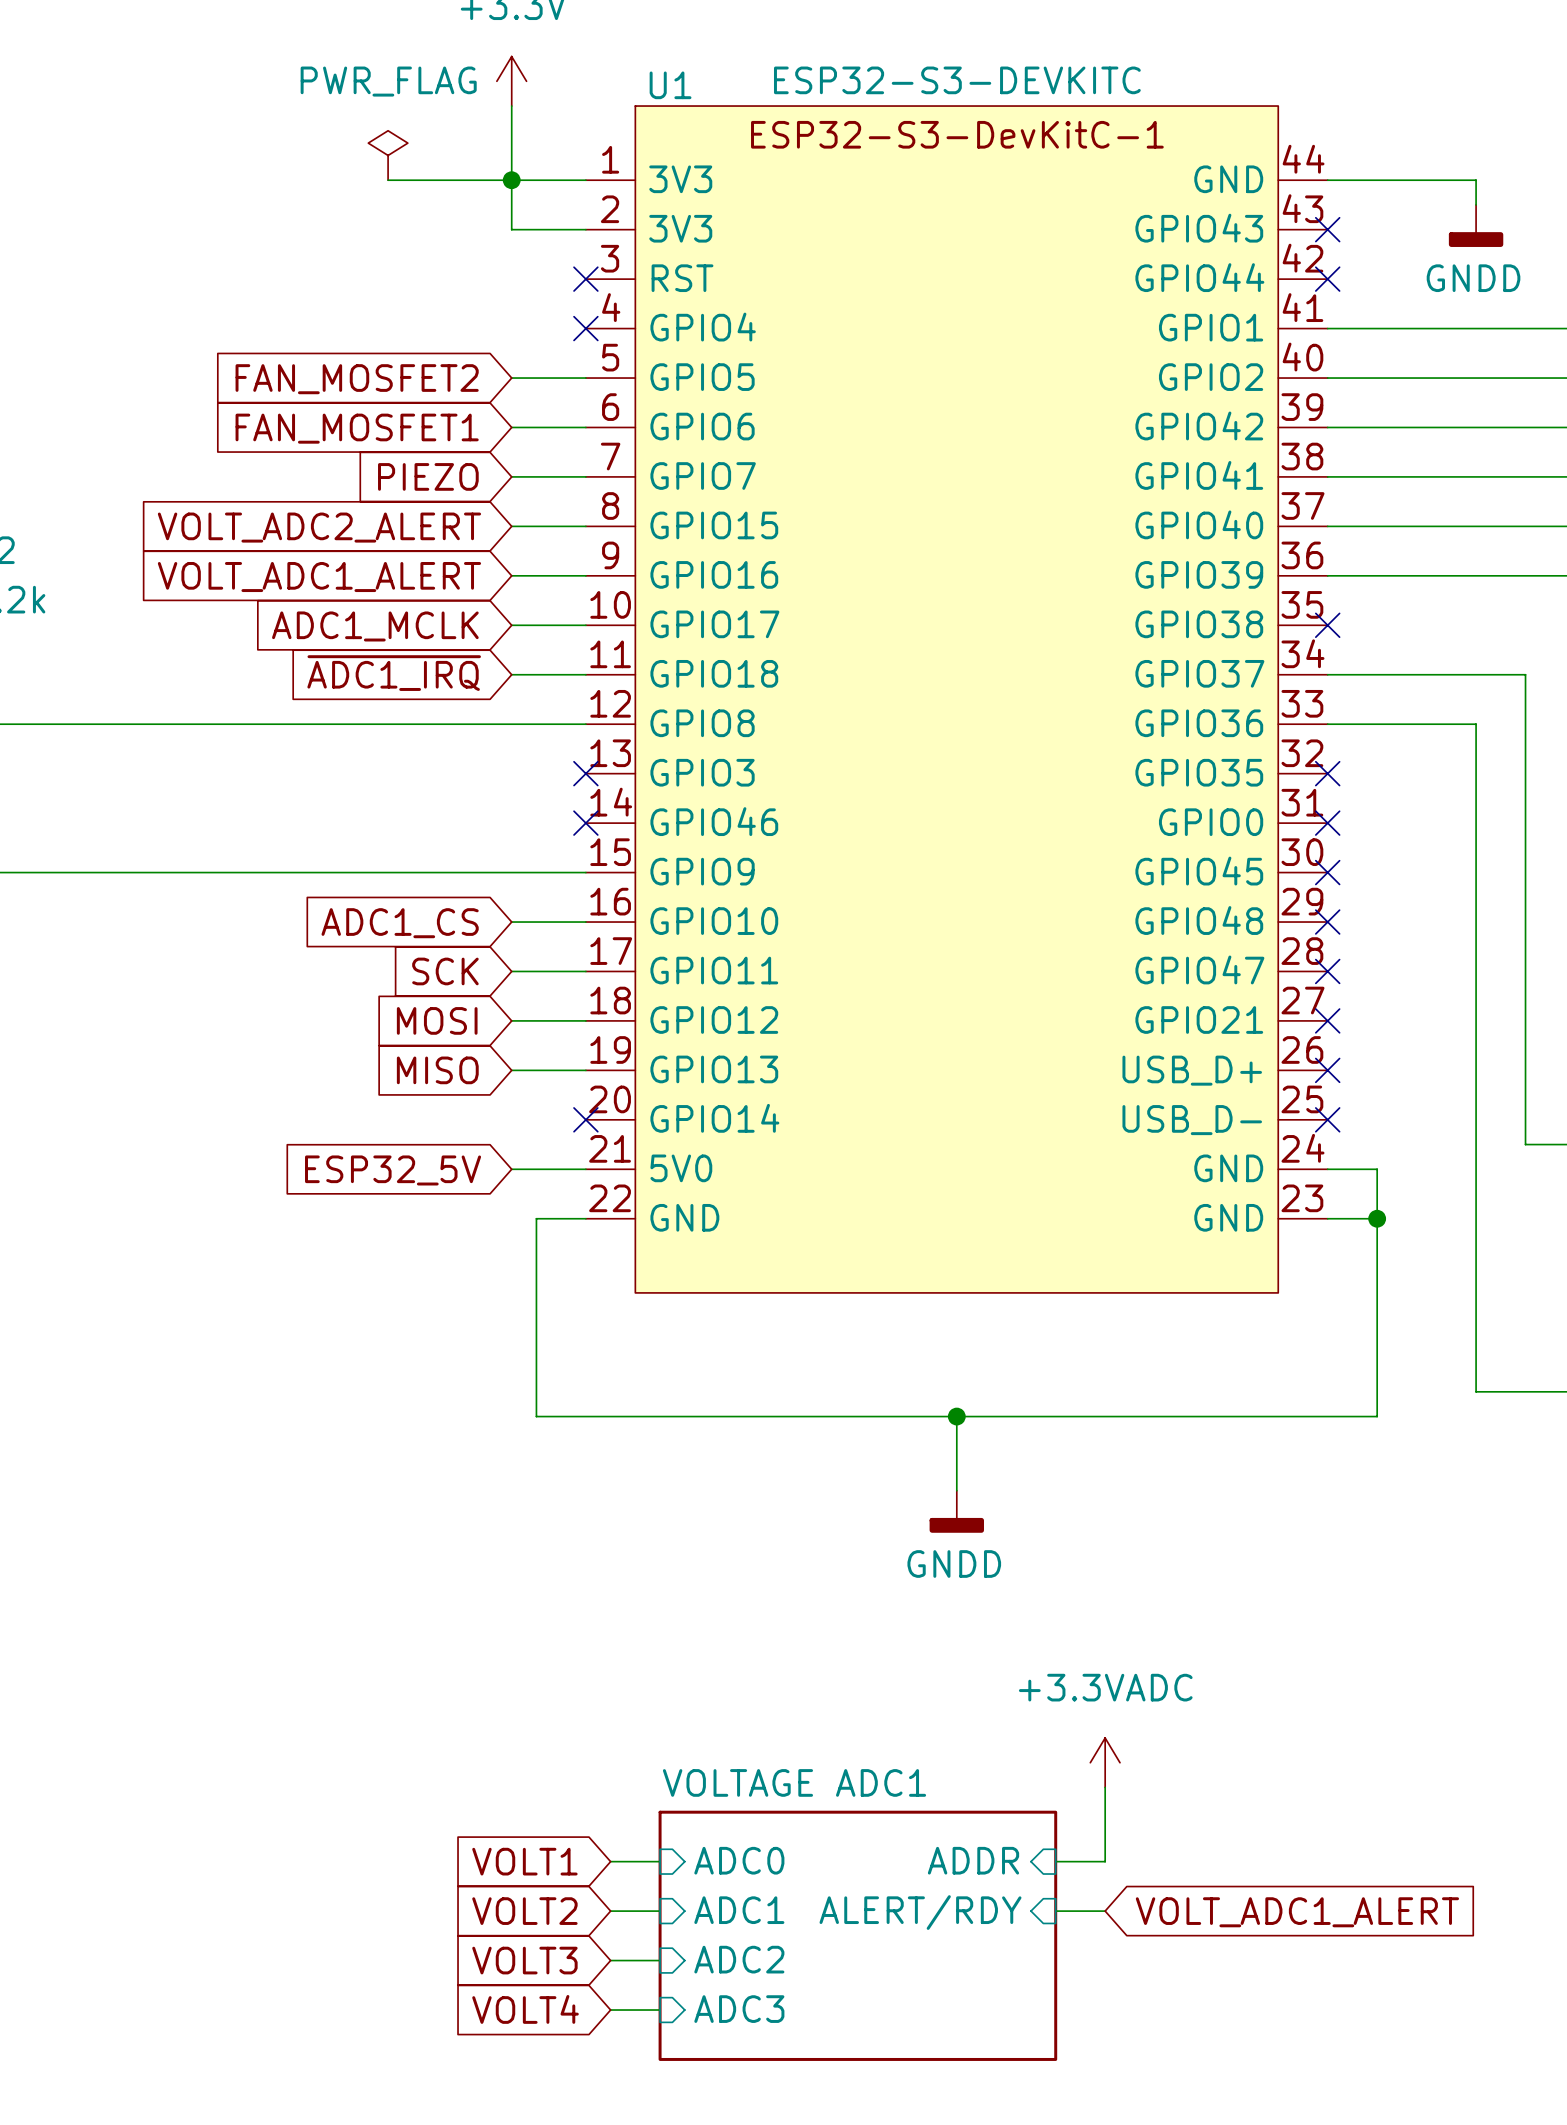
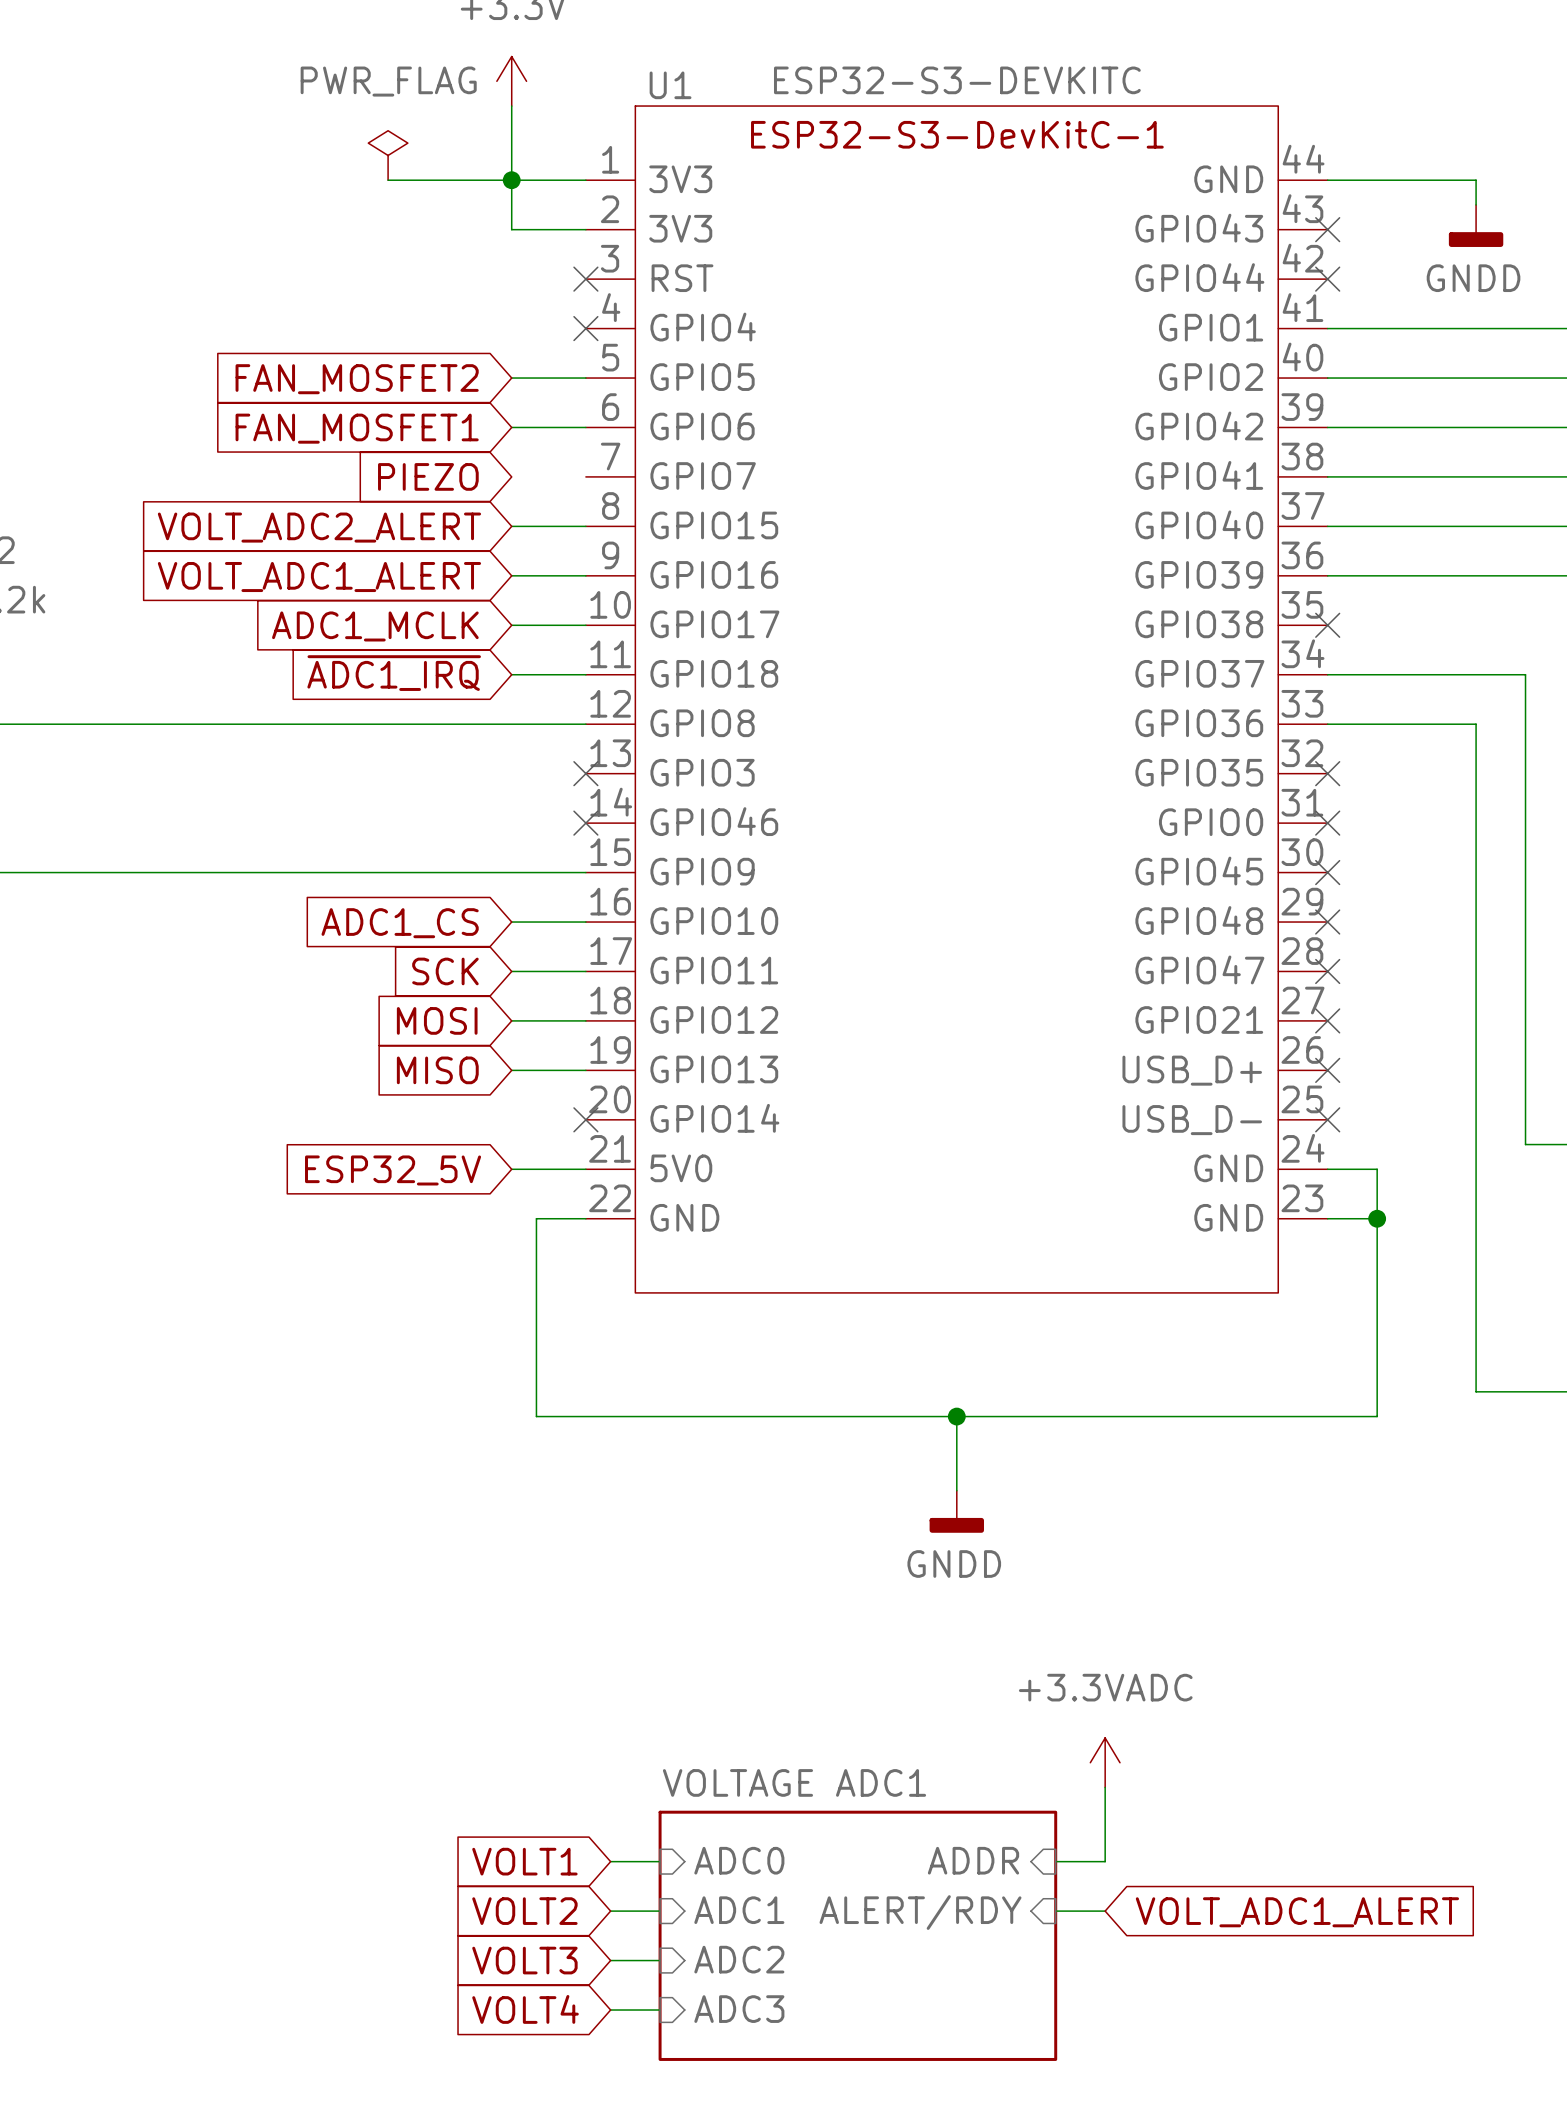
wire: (511, 476) (585, 476) -> none

